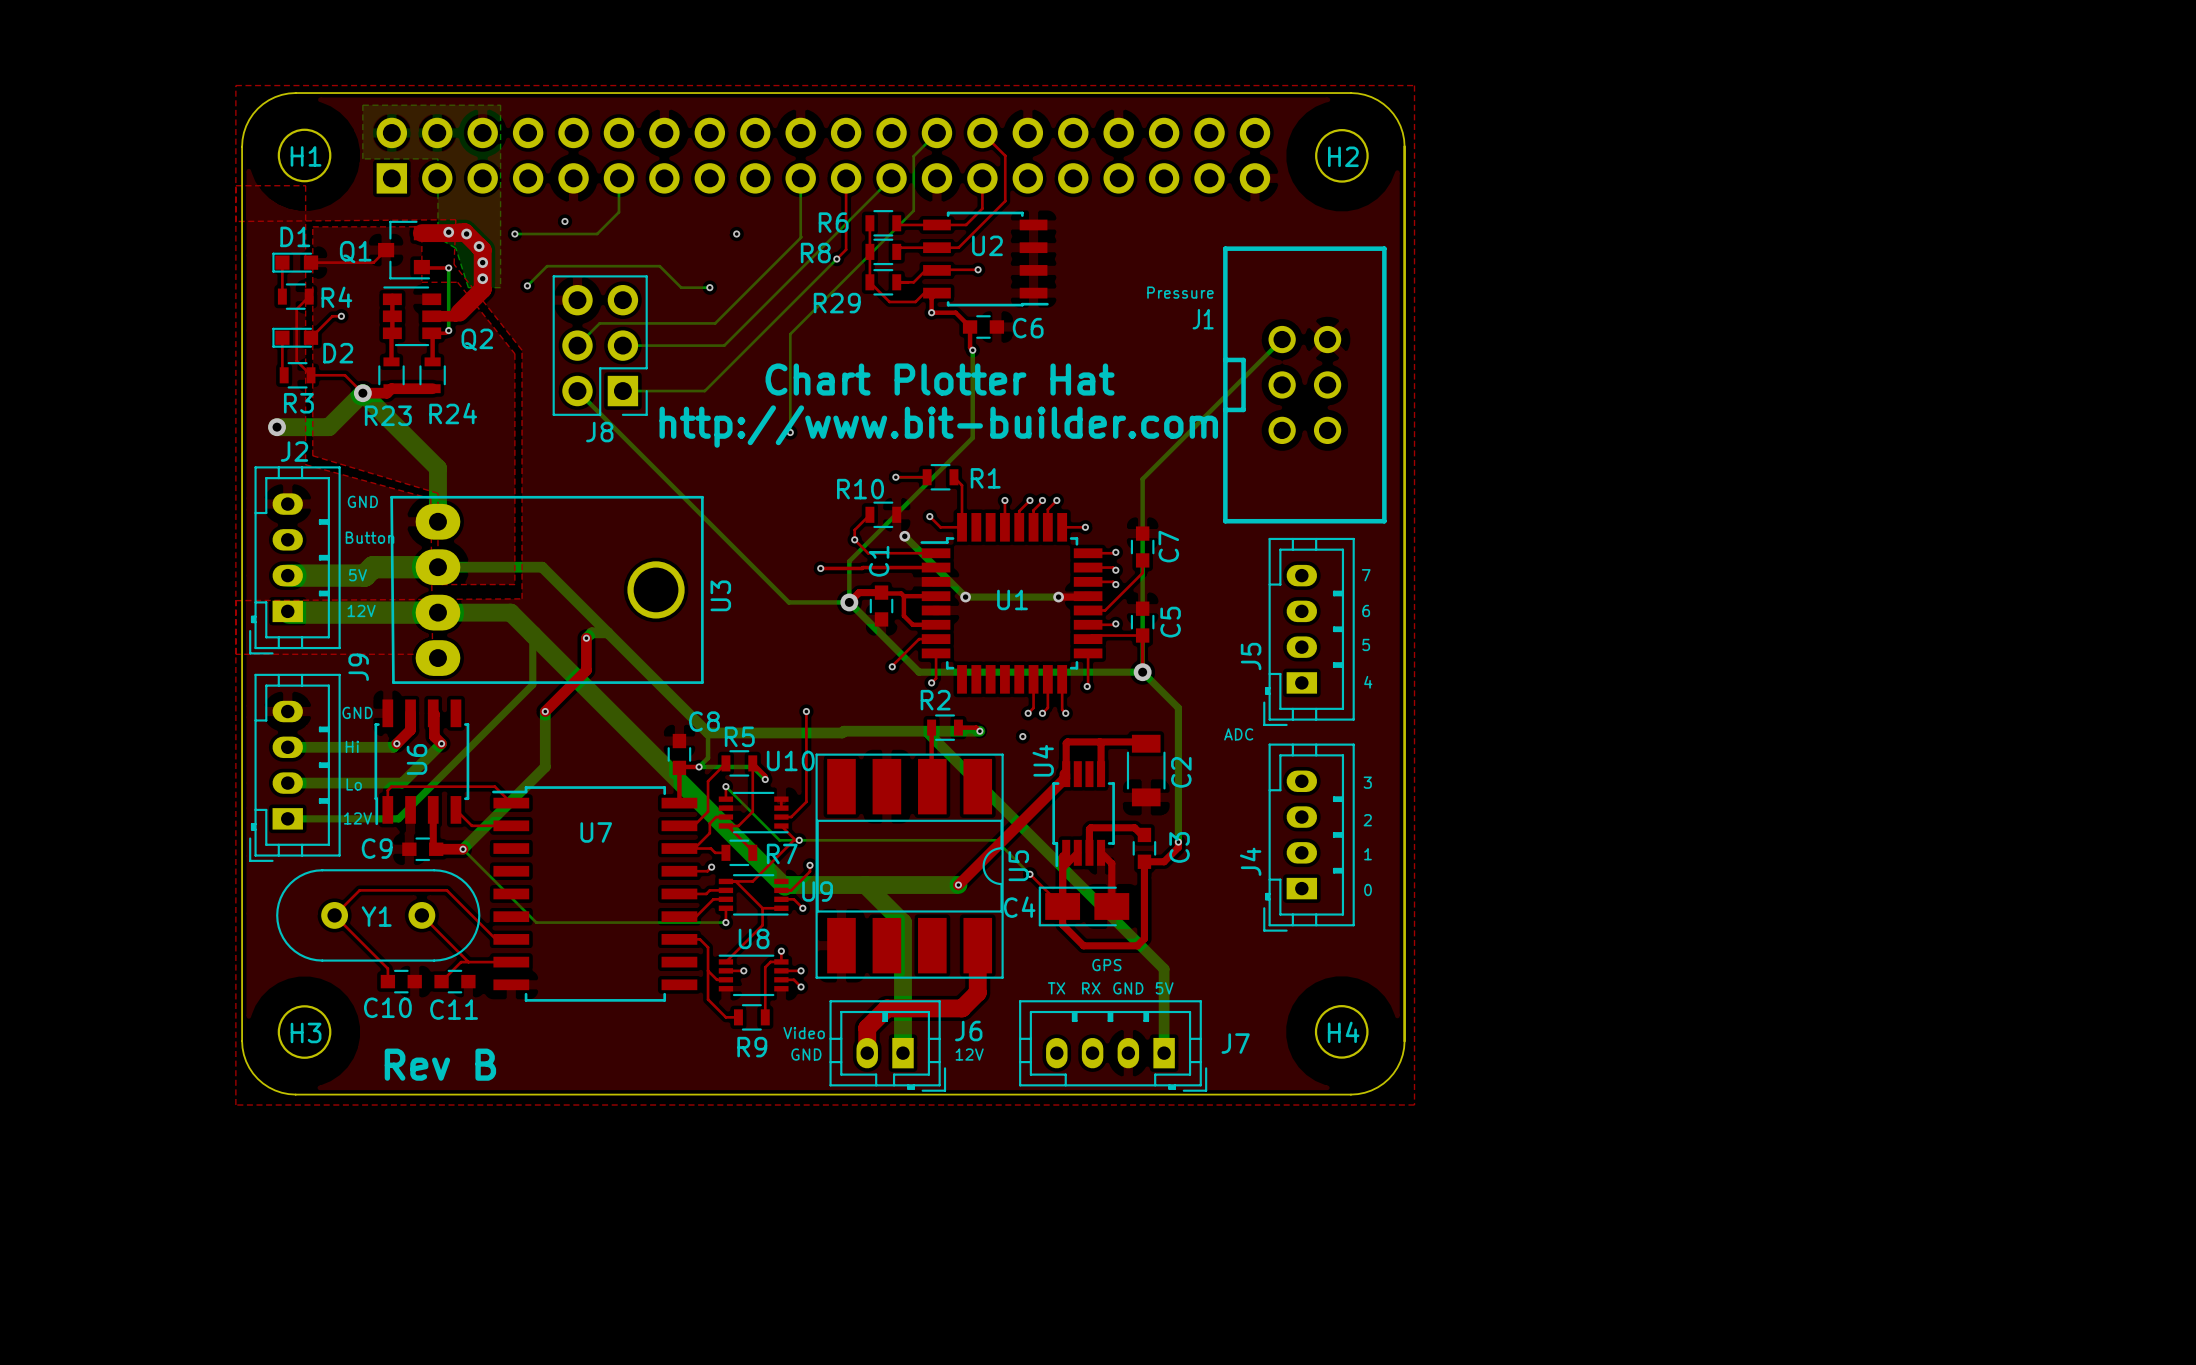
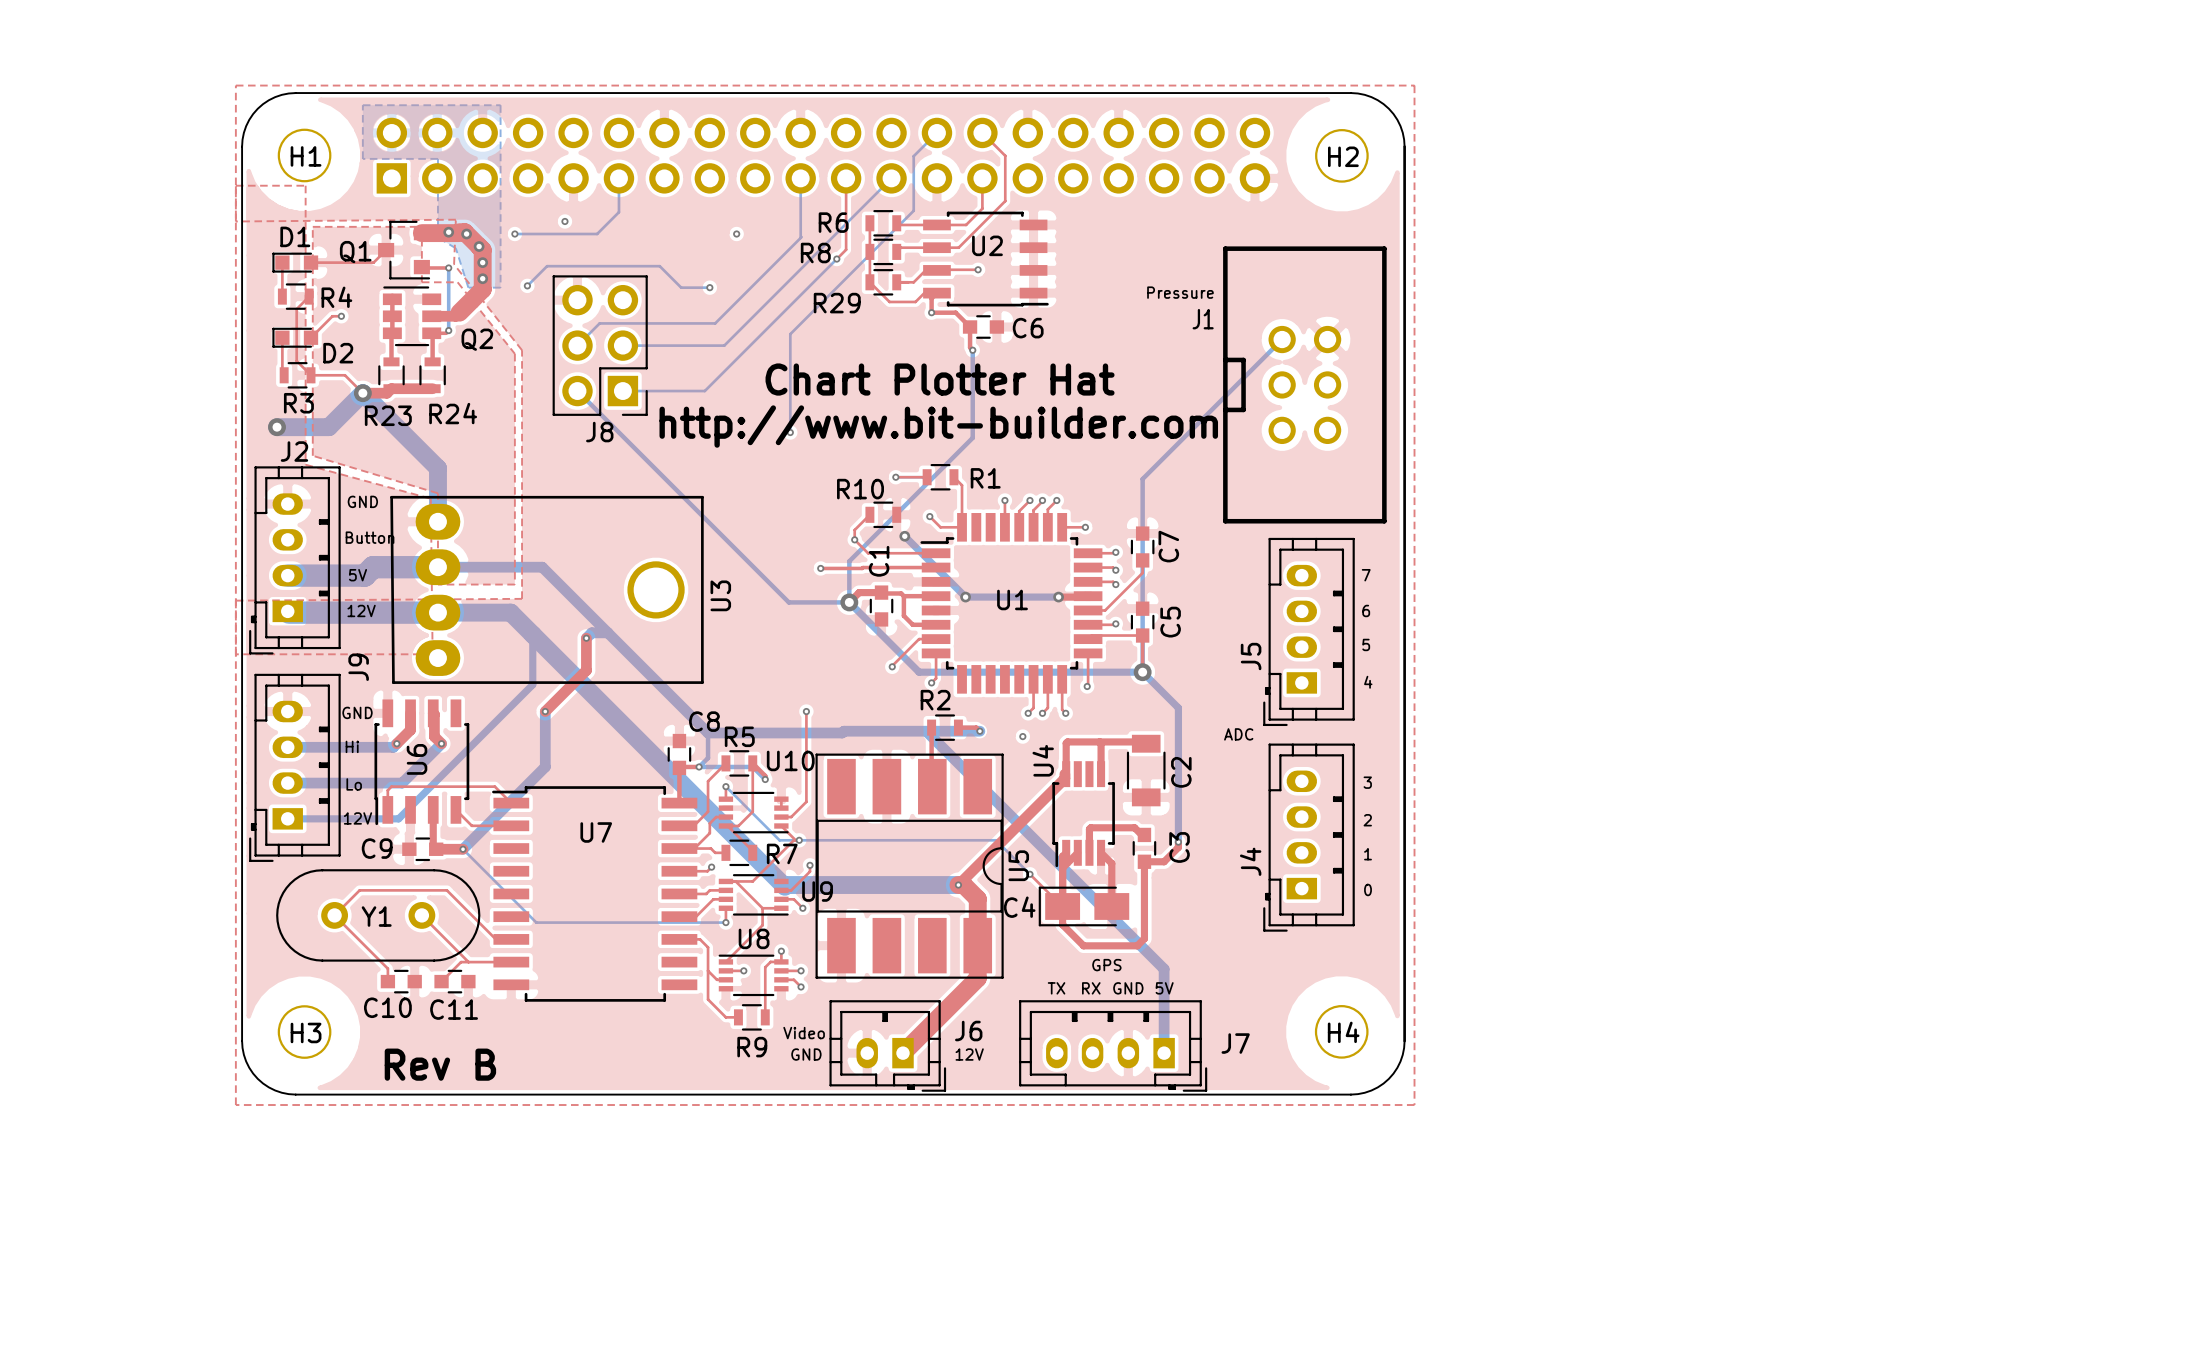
bottom track: (865, 885) (902, 922) (902, 1053) -> none
top track: none -> (958, 885) (963, 885) (977, 898) (977, 945)
top track: (977, 978) (977, 992) (962, 1008) (886, 1008) (867, 1028) (867, 1053) -> (977, 978) (902, 1053)

